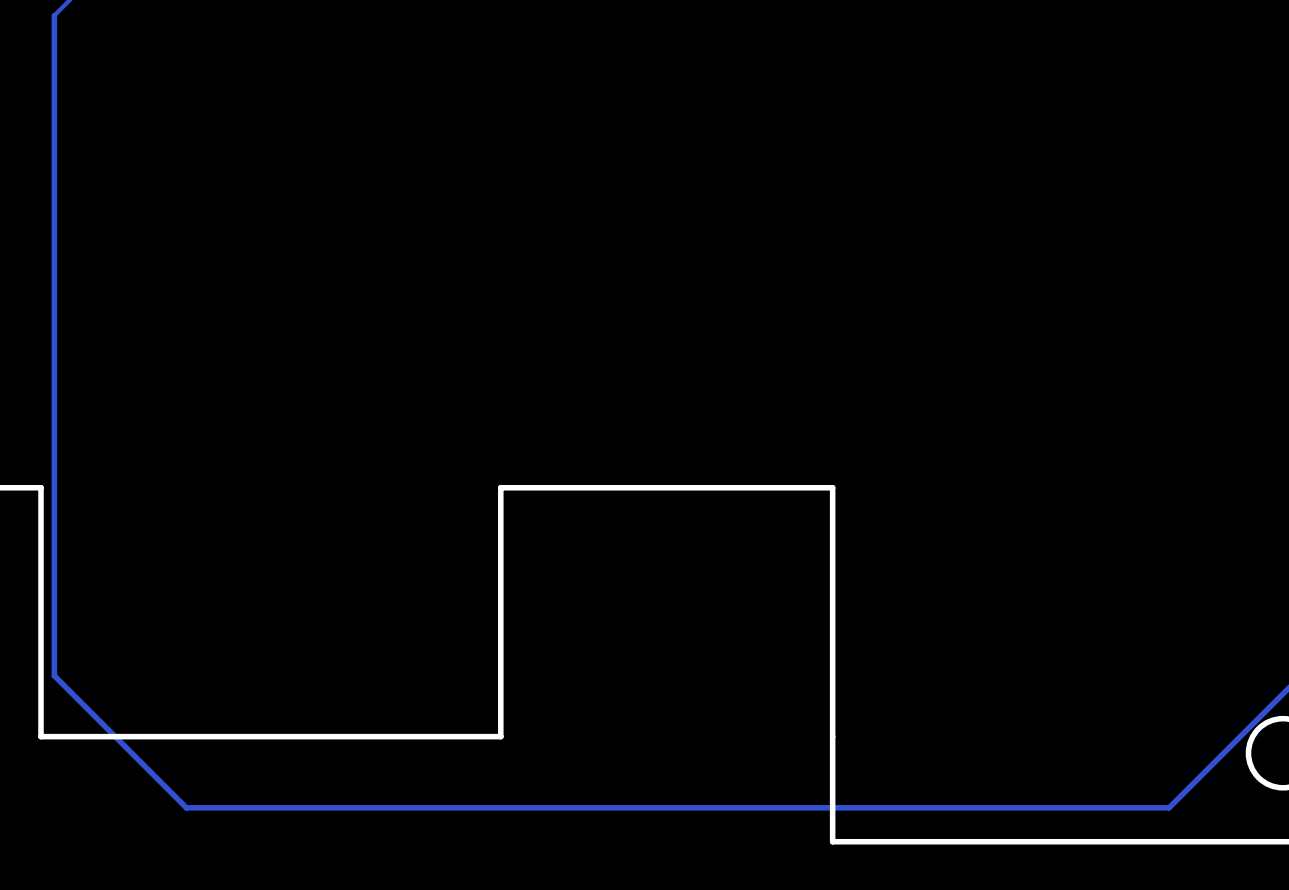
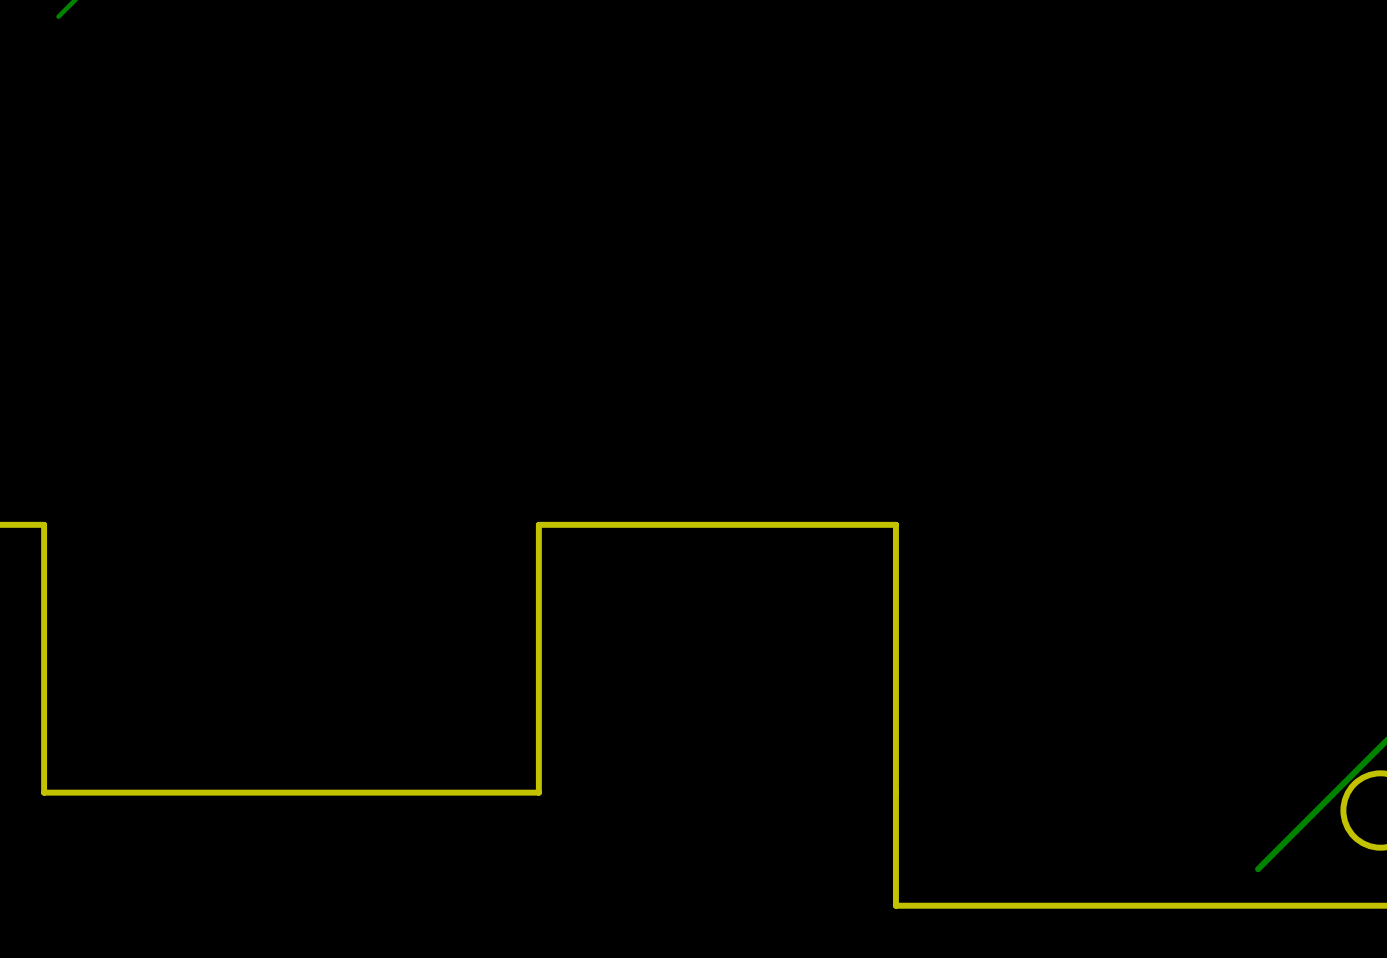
track: (54, 15) (54, 675) (186, 807) (1169, 807) -> none

